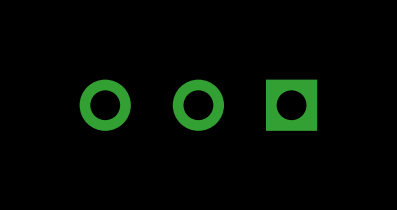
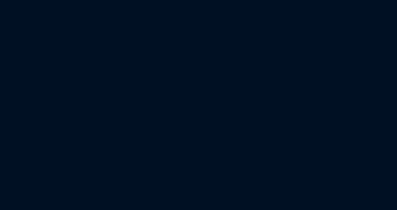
part: (198, 105) -> none

